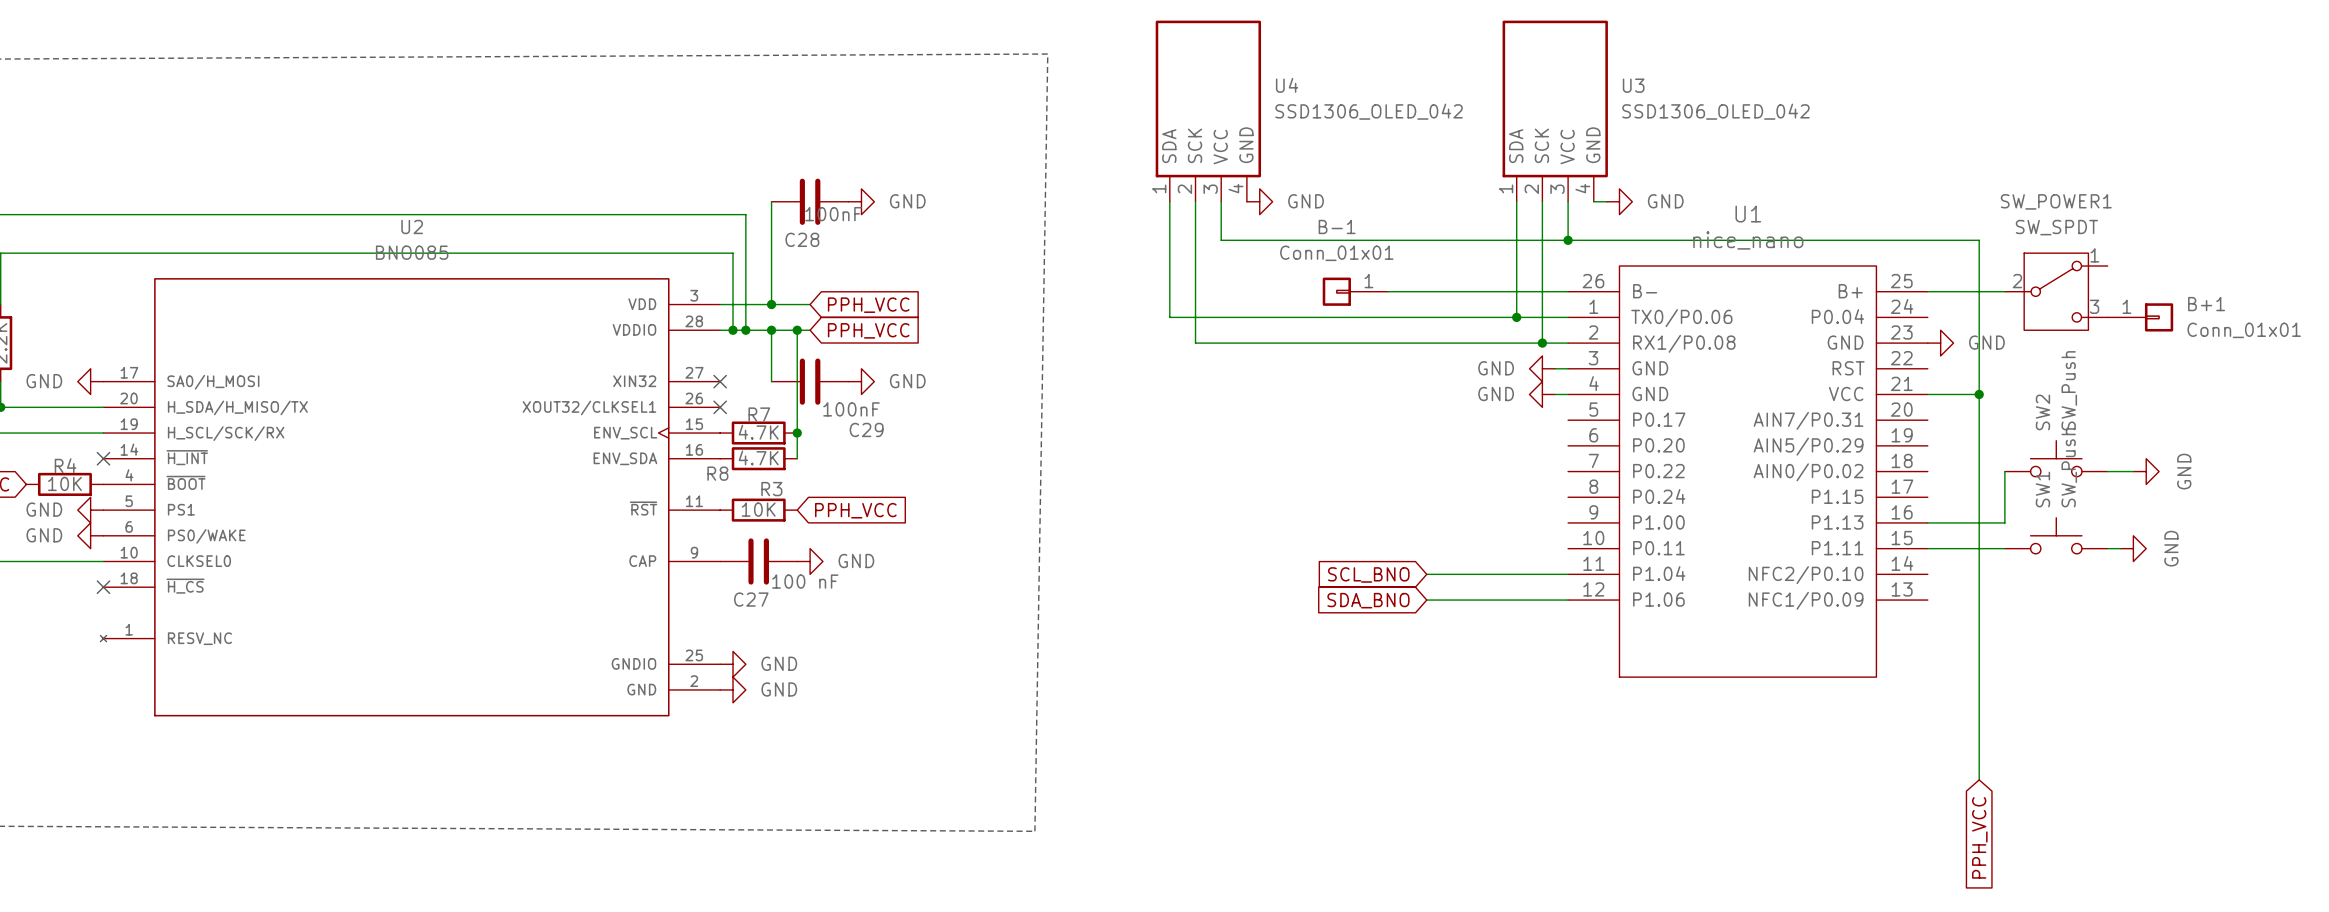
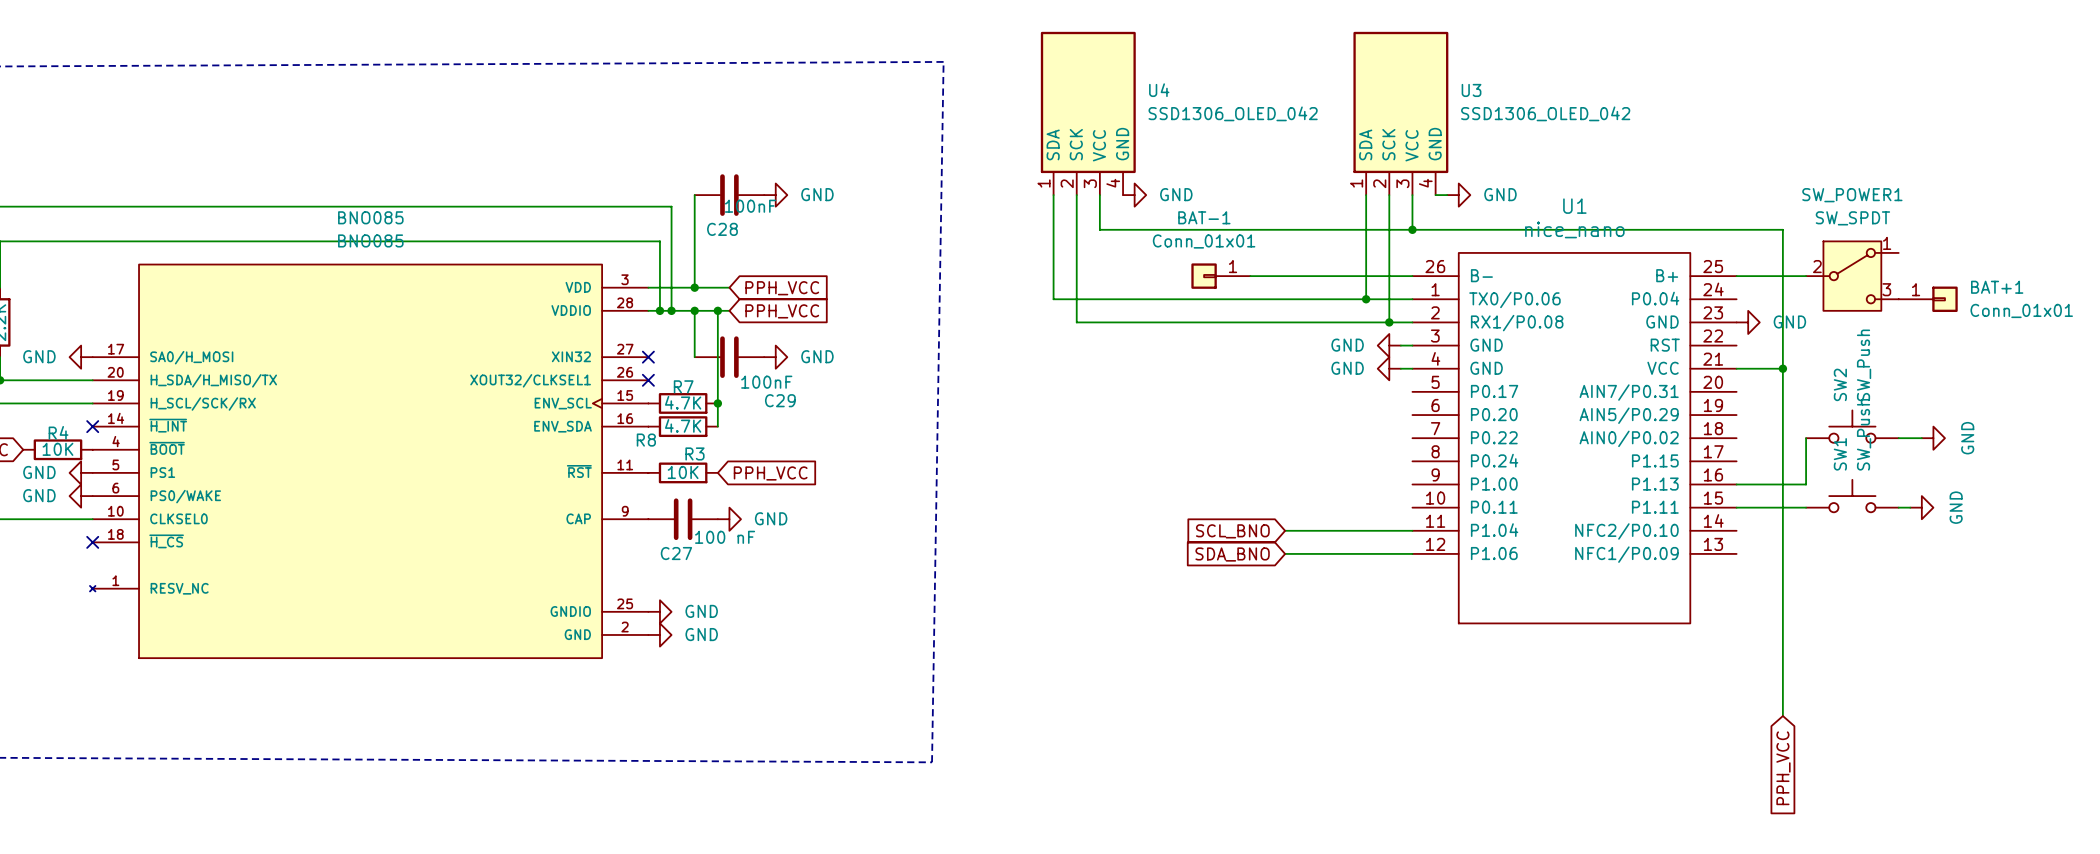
U2 name: U2 (412, 226) -> BNO085 (370, 217)
B-1 name: B-1 (1337, 226) -> BAT-1 (1204, 217)
B+1 name: B+1 (2206, 304) -> BAT+1 (1997, 287)

